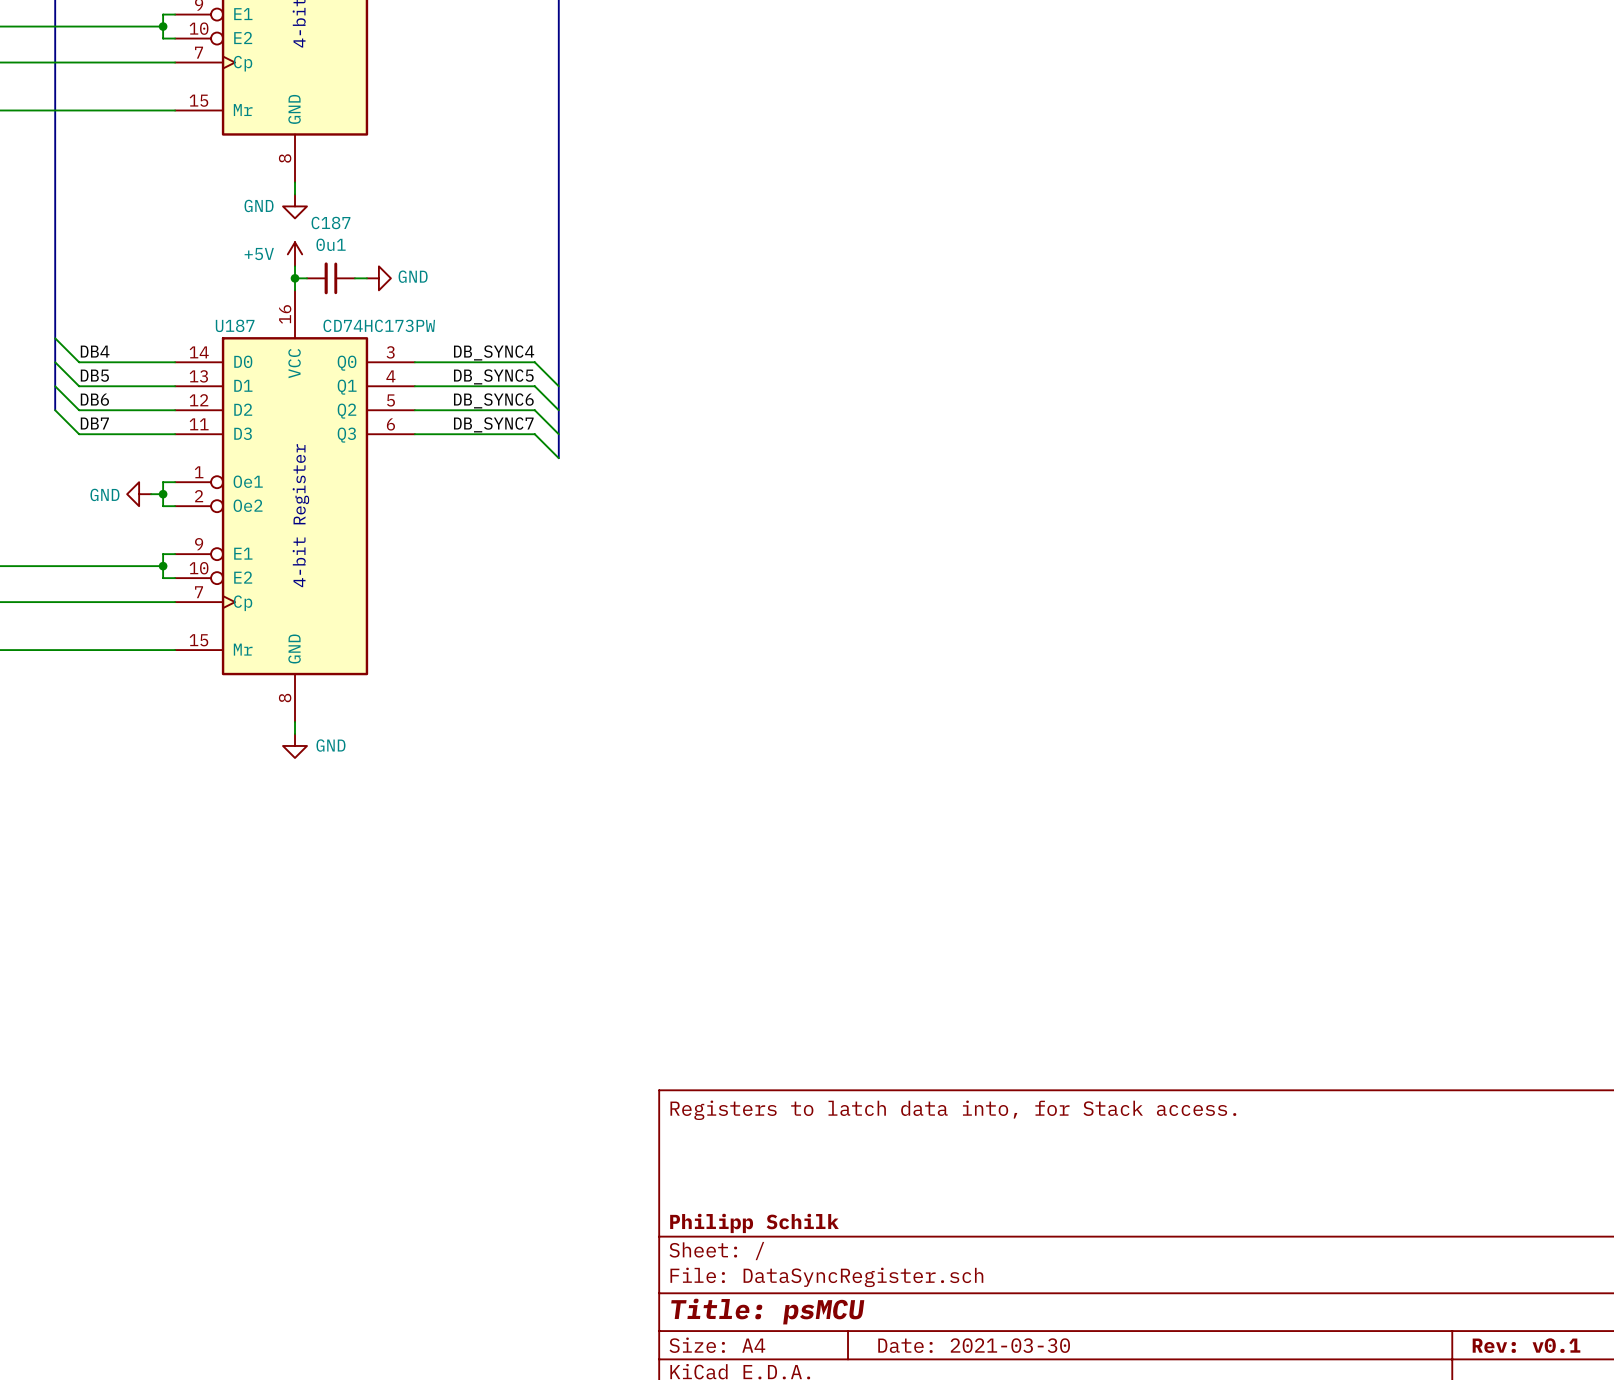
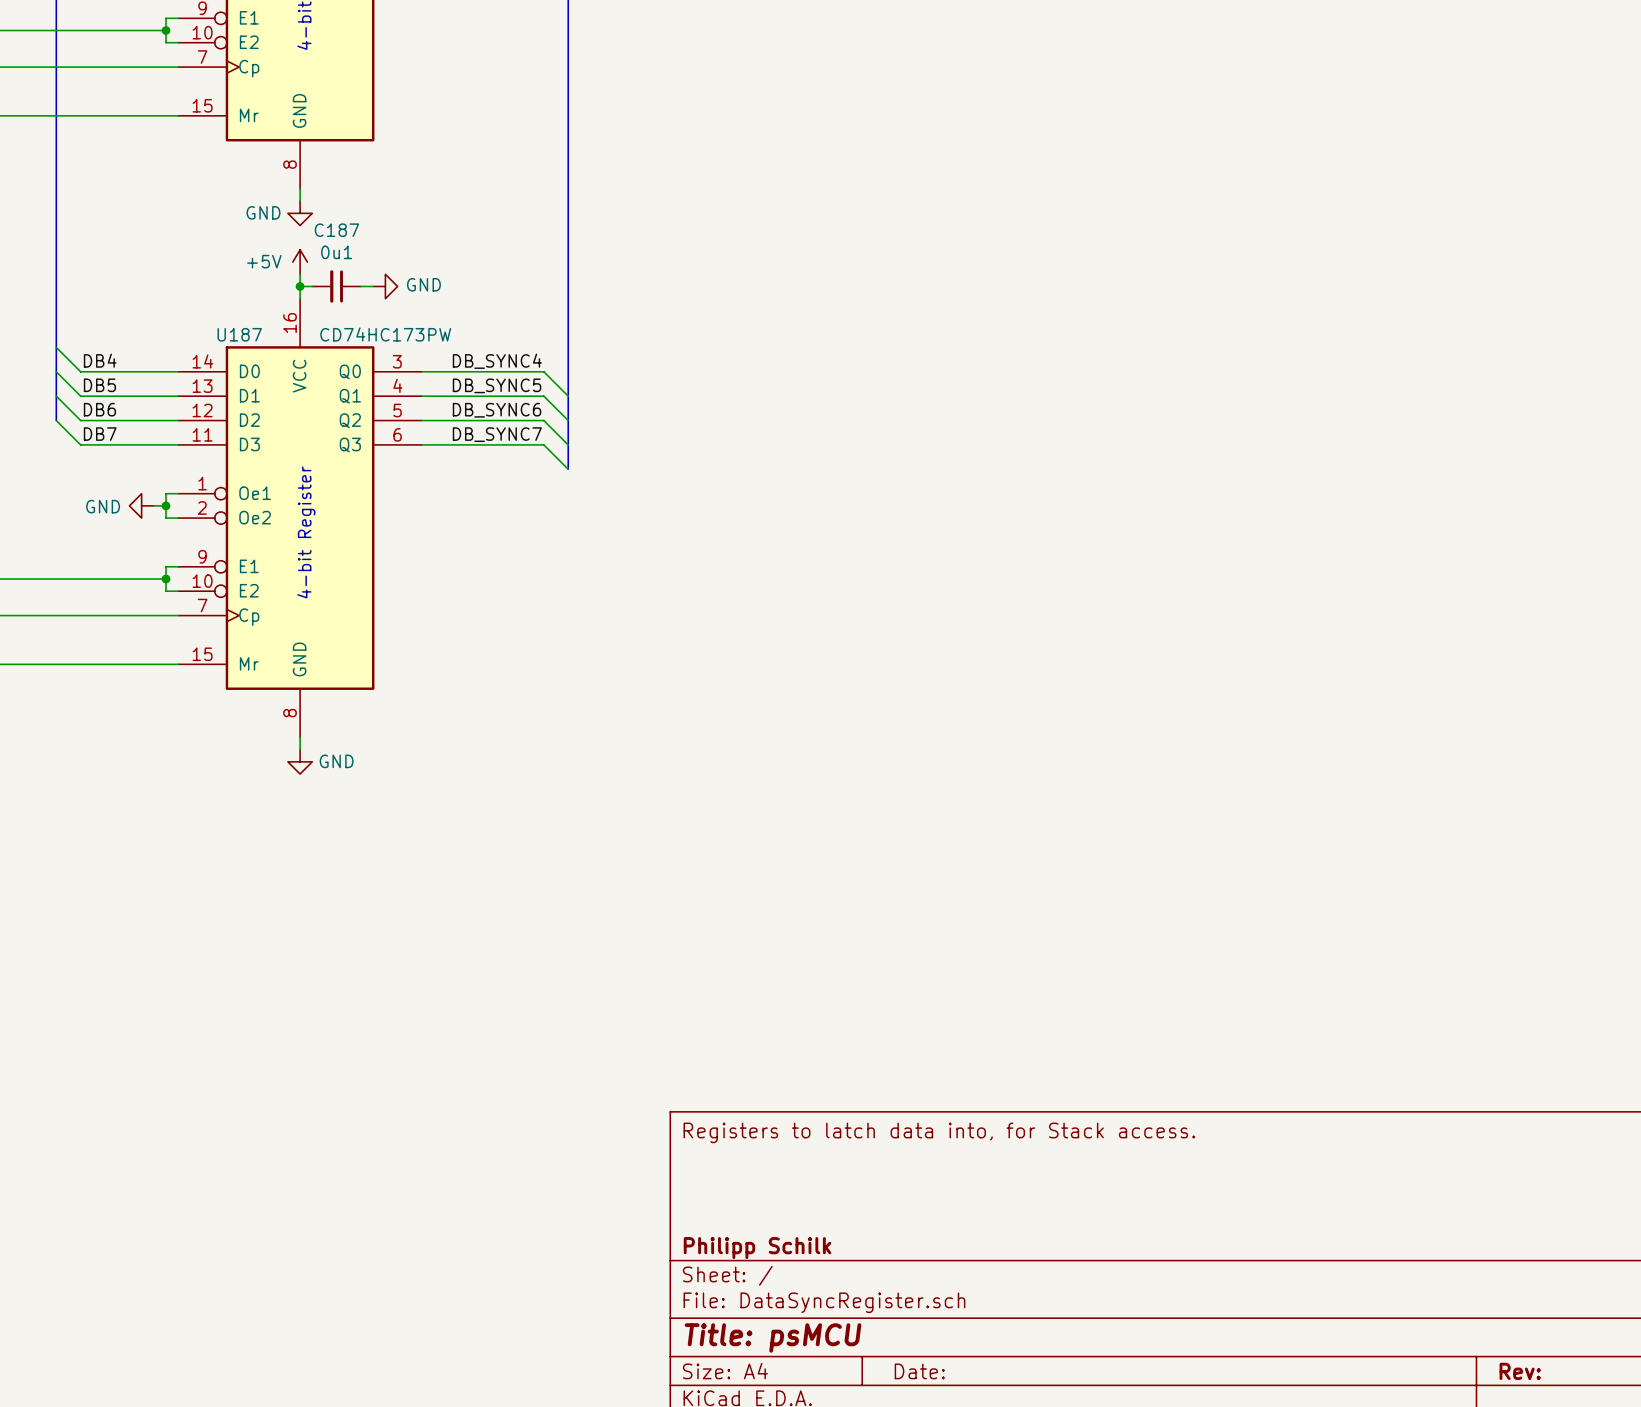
title block: Date: 2021-03-30 (974, 1345) -> Date: (919, 1371)
title block: Rev: v0.1 (1526, 1345) -> Rev: (1520, 1371)

